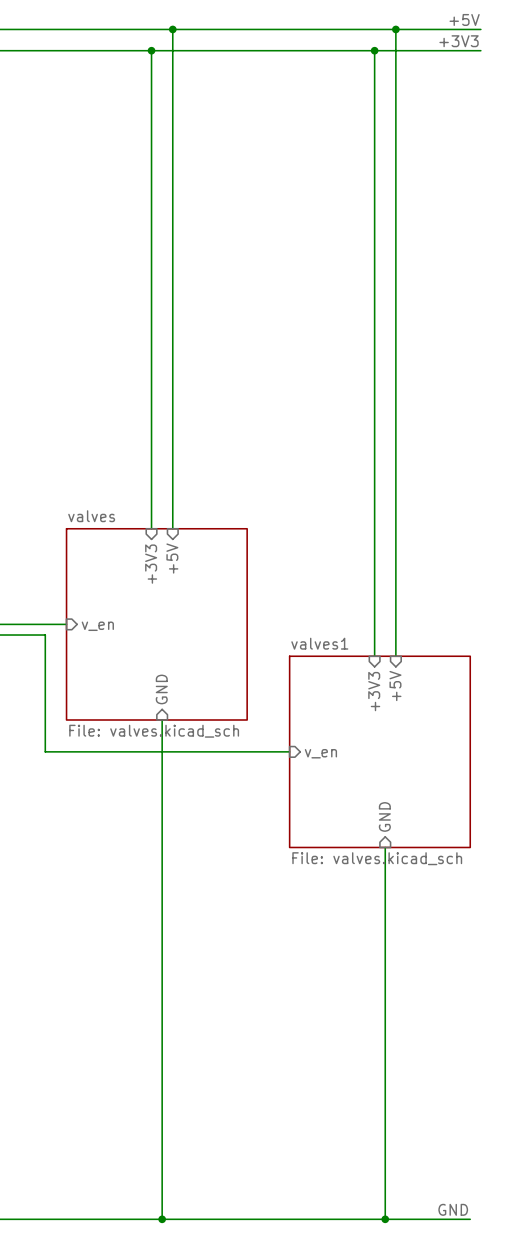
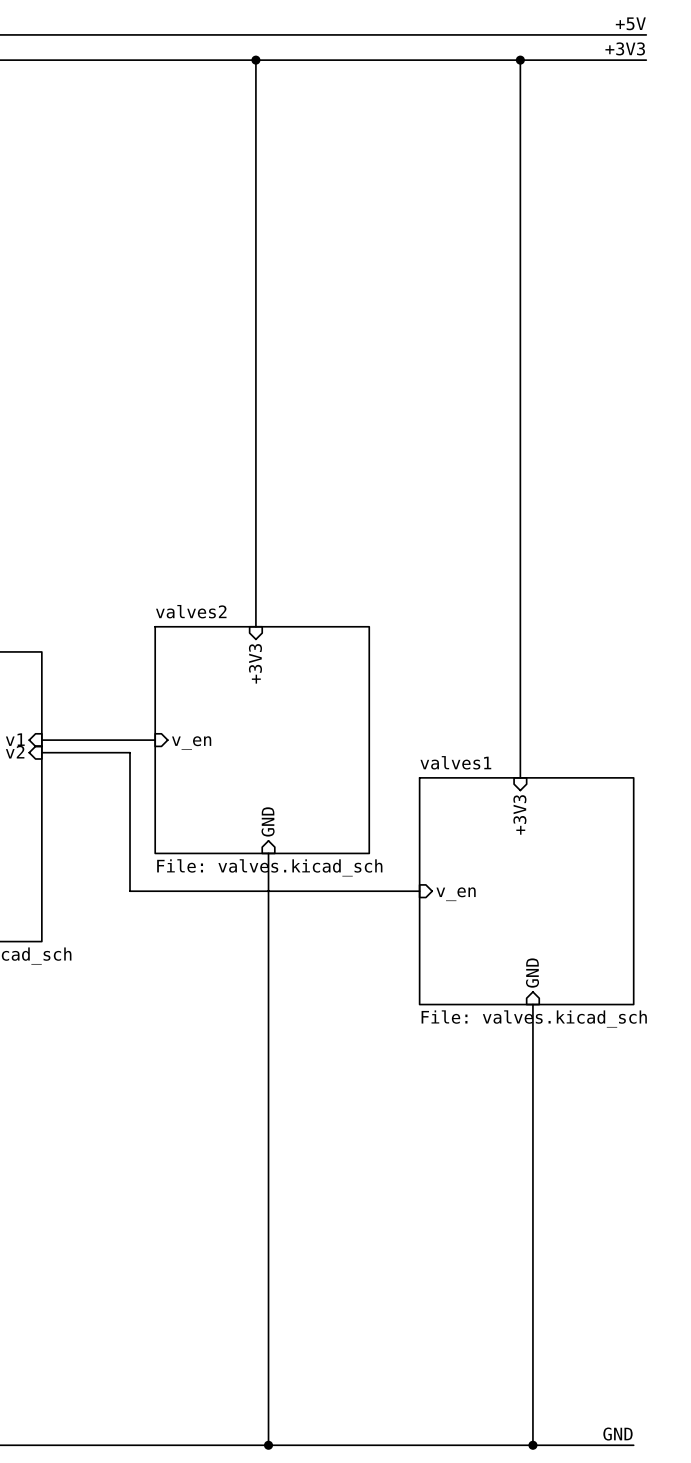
wire: (172, 29) (172, 528) -> none
junction: (172, 29) -> none
wire: (395, 29) (395, 656) -> none
junction: (395, 29) -> none
sheet valves name: valves (91, 516) -> valves2 (191, 611)
sheet pin: +5V (172, 558) -> none
sheet pin: +5V (395, 686) -> none

